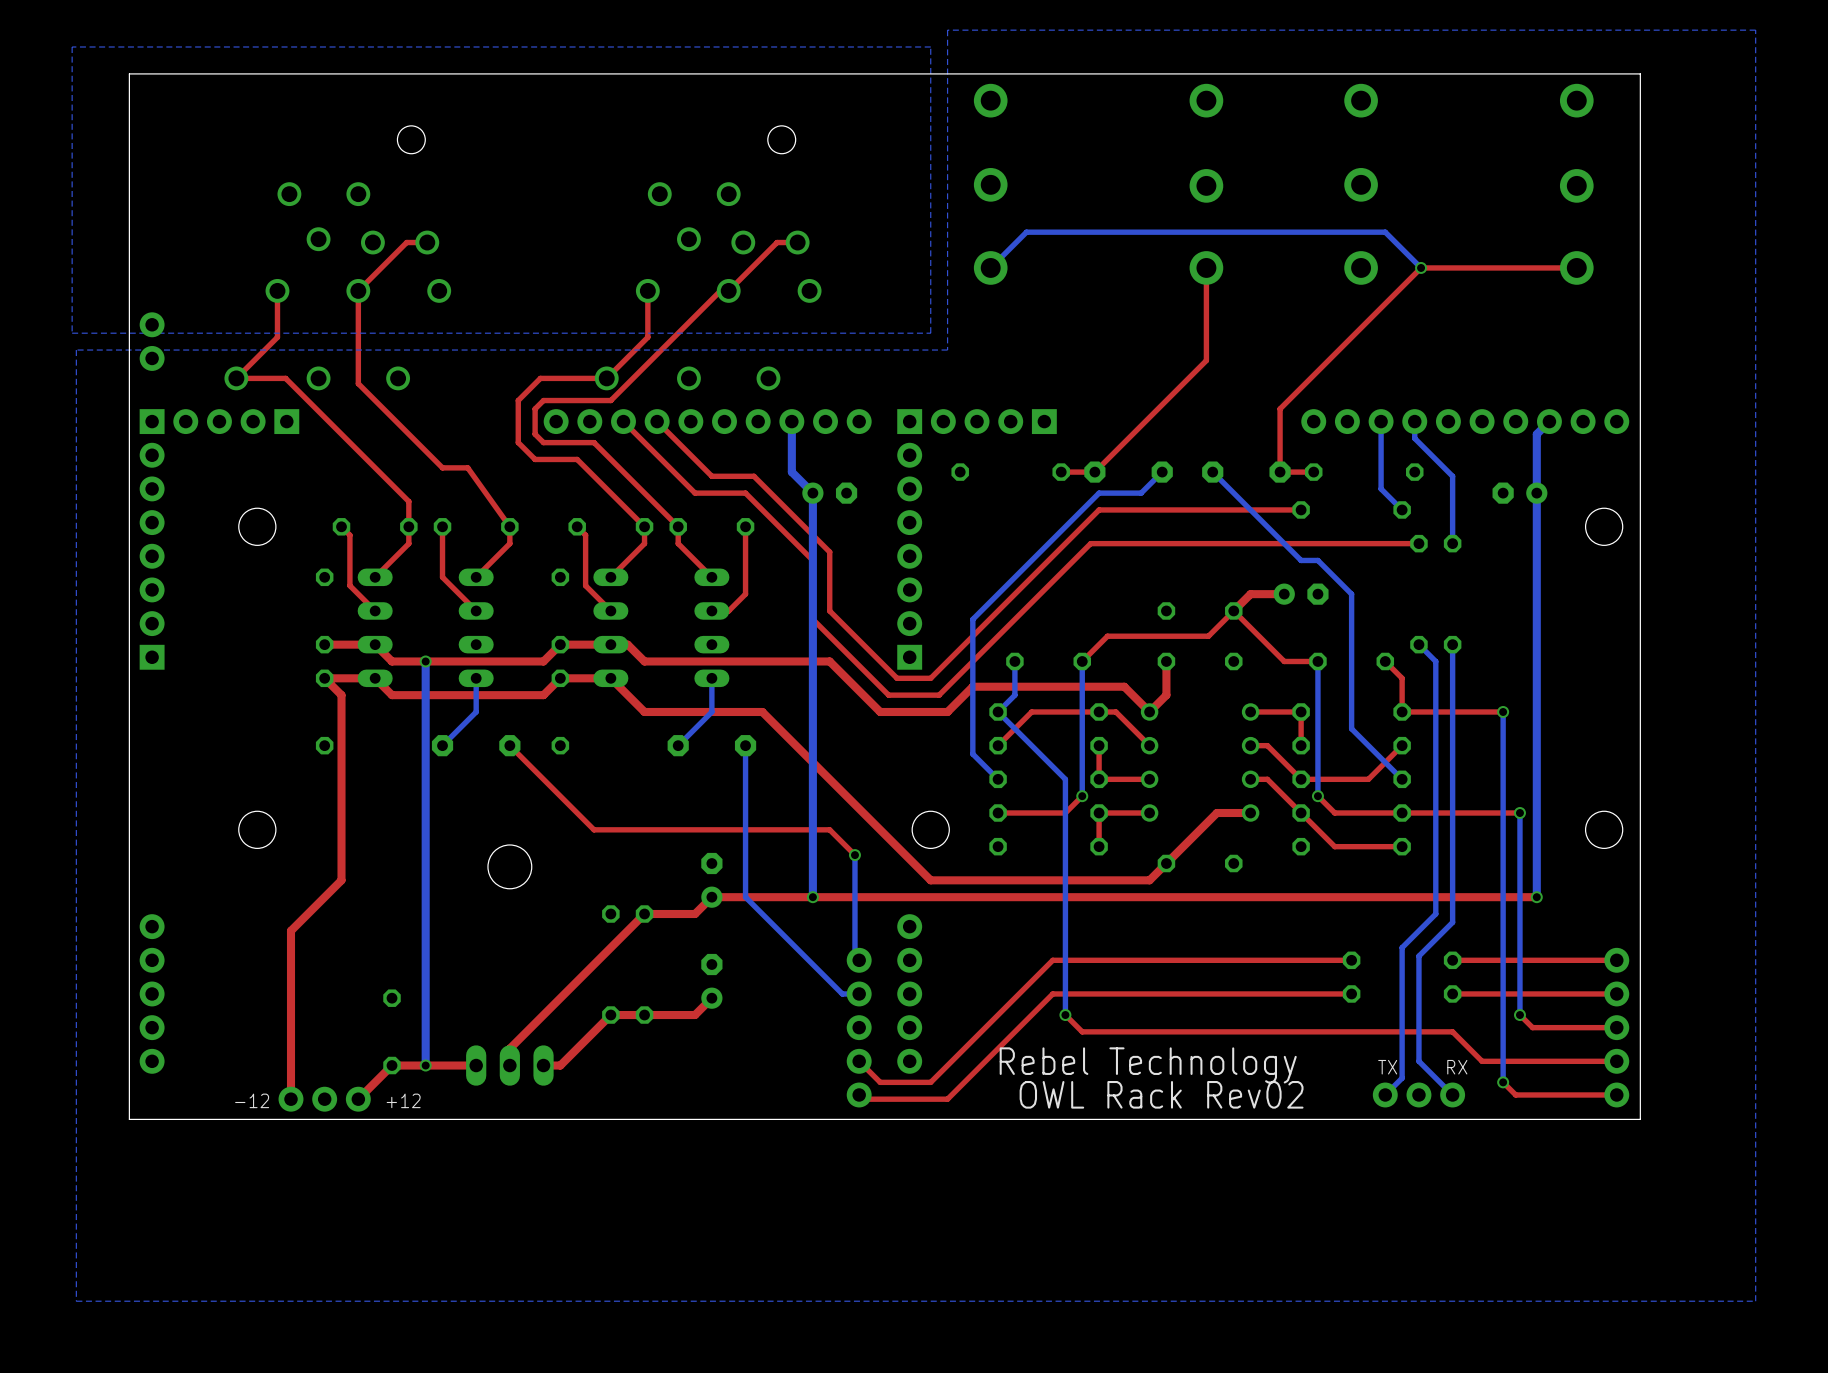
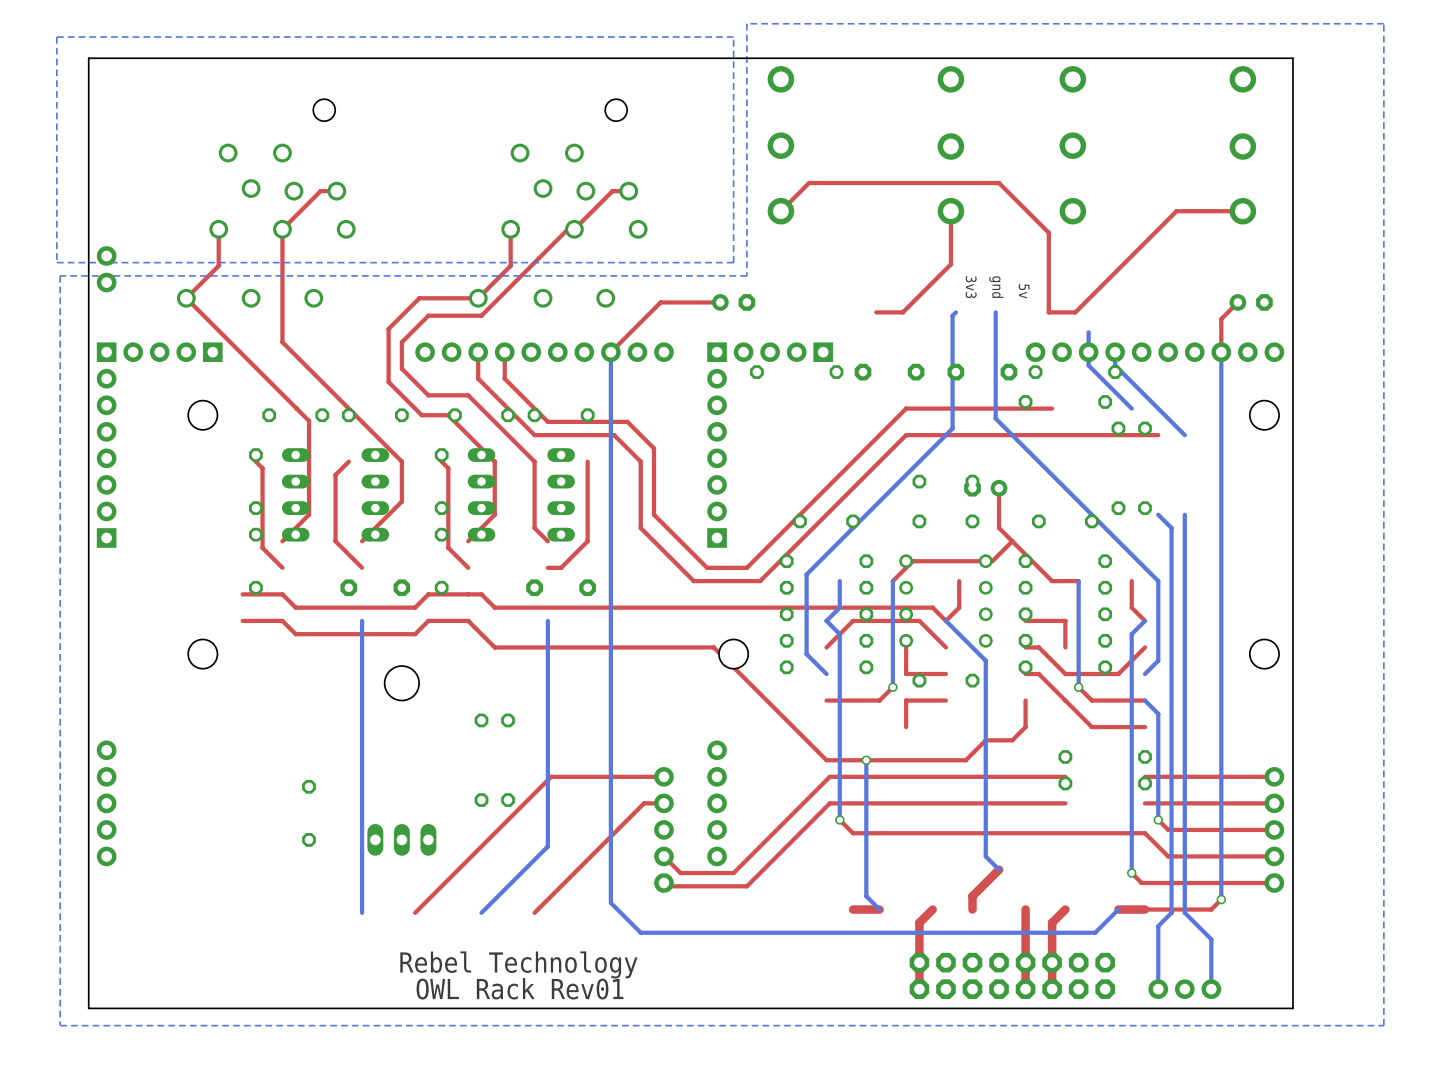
board edge: (129, 73) (129, 1119) (1640, 1119) -> (101, 58) (88, 58) (88, 1008) (1292, 1008) (1292, 882)
bottom track: (1421, 267) (1385, 232) (1026, 232) (990, 267) -> none
via: (1421, 267) -> none
top track: (1492, 267) (1421, 267) (1280, 408) (1280, 472) (1313, 472) -> (1176, 211) (1075, 312) (1048, 312) (1048, 232) (999, 183) (809, 183) (780, 211)
top track: (1206, 335) (1206, 360) (1094, 472) (1061, 472) -> (950, 264) (902, 312) (876, 312)
part position: (152, 341) -> (106, 269)
text: none -> 3v3 (971, 287)
text: none -> gnd (996, 287)
text: none -> 5v (1024, 291)
top track: (236, 378) (285, 378) (408, 501) (408, 543) (375, 577) -> (186, 298) (308, 420) (308, 514) (282, 541)
top track: (540, 378) (518, 400) (518, 442) (535, 459) (577, 459) (644, 526) (644, 543) (610, 577) -> (425, 298) (419, 298) (388, 328) (388, 382) (421, 415) (448, 415) (494, 461) (494, 514) (468, 541)
top track: (358, 383) (442, 467) (467, 467) (509, 526) (509, 543) (476, 577) -> (282, 302) (282, 342) (401, 461) (401, 501) (362, 541)
top track: none -> (720, 302) (660, 302) (610, 352)
top track: none -> (1237, 302) (1221, 319) (1221, 352)
bottom track: none -> (955, 312) (952, 315) (952, 428) (806, 574) (806, 654) (826, 674)
bottom track: none -> (995, 312) (995, 418) (1158, 581) (1158, 660) (1144, 674)
top track: (535, 408) (535, 434) (543, 442) (594, 442) (678, 526) (678, 543) (711, 577) -> (421, 322) (401, 342) (401, 368) (428, 395) (468, 395) (534, 461) (534, 528) (547, 541)
part position: (236, 421) -> (172, 352)
top track: (623, 421) (695, 493) (745, 493) (812, 560) (812, 585) -> (478, 352) (478, 378) (534, 435) (614, 435) (640, 461)
part position: (623, 421) -> (478, 352)
top track: (657, 421) (711, 476) (753, 476) (829, 552) (829, 568) -> (504, 352) (504, 378) (547, 421) (627, 421) (654, 448)
part position: (741, 421) -> (571, 352)
bottom track: (791, 421) (791, 472) (812, 493) (812, 897) -> none
part position: (825, 421) -> (637, 352)
part position: (993, 421) -> (783, 352)
part position: (1381, 421) -> (1088, 352)
bottom track: (1414, 421) (1414, 438) (1452, 476) (1452, 543) -> none
part position: (1498, 421) -> (1181, 352)
bottom track: (1549, 421) (1536, 434) (1536, 897) -> none
part position: (1583, 421) -> (1247, 352)
bottom track: none -> (610, 352) (610, 902) (640, 932) (1095, 932) (1118, 909)
bottom track: none -> (1115, 352) (1115, 365) (1184, 435)
bottom track: none -> (1221, 352) (1221, 899)
bottom track: (1381, 463) (1381, 488) (1402, 509) -> (1088, 365) (1131, 408)
part position: (152, 472) -> (106, 392)
part position: (909, 472) -> (717, 392)
bottom track: (1162, 472) (1141, 493) (1099, 493) (972, 619) (972, 754) (998, 779) -> none
bottom track: (1212, 472) (1301, 560) (1317, 560) (1351, 594) (1351, 728) (1402, 779) -> none
part position: (829, 493) -> (733, 302)
part rotation: 0° (1519, 493) -> 180° (1251, 302)
part position: (1519, 493) -> (1251, 302)
top track: (1301, 509) (1099, 509) (930, 678) (897, 678) (829, 610) -> (1052, 408) (906, 408) (746, 567) (707, 567) (654, 514) (654, 481)
top track: (341, 526) (349, 535) (349, 585) (375, 610) -> none
top track: (442, 526) (442, 577) (476, 610) -> none
top track: (577, 526) (585, 535) (585, 585) (610, 610) -> none
top track: (745, 526) (745, 585) -> none
top track: (1418, 543) (1090, 543) (939, 695) (888, 695) (812, 619) -> (1158, 435) (906, 435) (760, 581) (693, 581) (640, 528) (640, 488)
top track: none -> (255, 461) (262, 468) (262, 547) (282, 567)
top track: none -> (348, 461) (335, 474) (335, 541) (362, 567)
top track: none -> (441, 461) (448, 468) (448, 547) (468, 567)
top track: (745, 594) (728, 610) (711, 610) -> (587, 468) (587, 541) (561, 567) (547, 567)
top track: (1284, 594) (1250, 594) (1233, 610) -> none
part rotation: 0° (1301, 594) -> 180° (985, 488)
part position: (1301, 594) -> (985, 488)
part position: (152, 606) -> (106, 498)
part position: (909, 606) -> (717, 498)
top track: (1233, 610) (1284, 661) (1317, 661) -> none
top track: (1233, 610) (1208, 636) (1107, 636) (1082, 661) -> none
top track: none -> (999, 488) (999, 528) (1052, 581) (1078, 581)
top track: (324, 644) (375, 644) (392, 661) (543, 661) (560, 644) (627, 644) (644, 661) (829, 661) (880, 711) (947, 711) (972, 686) (1124, 686) (1149, 711) (1166, 695) (1166, 661) -> none
bottom track: (1418, 644) (1435, 661) (1435, 804) -> (1144, 620) (1131, 634)
bottom track: (1452, 644) (1452, 922) (1418, 956) (1418, 1061) (1452, 1094) -> none
bottom track: none -> (1158, 514) (1171, 528) (1171, 912) (1158, 926) (1158, 989)
bottom track: none -> (1184, 514) (1184, 561)
bottom track: (425, 661) (425, 1065) -> none
via: (425, 661) -> none
bottom track: (1014, 661) (1014, 695) (998, 711) (1065, 779) (1065, 804) -> (839, 581) (839, 607) (826, 620) (839, 634)
bottom track: (1082, 661) (1082, 796) -> (892, 581) (892, 687)
bottom track: (1317, 661) (1317, 796) -> (1078, 581) (1078, 687)
top track: (1385, 661) (1402, 678) (1402, 711) (1503, 711) -> none
bottom track: (476, 678) (476, 711) (442, 745) -> none
bottom track: (711, 678) (711, 711) (678, 745) -> none
top track: none -> (985, 561) (912, 561) (892, 581)
top track: (1259, 711) (1301, 711) (1301, 745) -> (992, 561) (1012, 541)
via: (1503, 711) -> none
top track: none -> (959, 581) (959, 607) (945, 620) (932, 607) (494, 607) (481, 594) (428, 594) (415, 607) (295, 607) (282, 594) (242, 594)
top track: none -> (1131, 581) (1131, 607) (1144, 620)
top track: (509, 745) (594, 829) (829, 829) (854, 855) -> none
bottom track: (745, 745) (745, 897) (842, 993) (859, 993) -> none
top track: (1099, 745) (1099, 779) (1149, 779) -> (906, 647) (906, 674) (945, 674)
top track: (1149, 745) (1115, 711) (1031, 711) (998, 745) -> (945, 647) (919, 620) (853, 620) (826, 647)
top track: (1402, 745) (1368, 779) (1301, 779) (1267, 745) (1250, 745) -> (1144, 647) (1118, 674) (1065, 674) (1038, 647) (1025, 647)
top track: (1250, 779) (1267, 779) (1334, 846) (1402, 846) -> (1025, 674) (1038, 674) (1091, 727) (1144, 727)
top track: none -> (242, 620) (282, 620) (295, 634) (415, 634) (428, 620) (468, 620) (494, 647) (713, 647) (826, 760) (965, 760) (985, 740) (1012, 740) (1025, 727) (1025, 700)
bottom track: none -> (362, 620) (362, 912)
bottom track: none -> (547, 620) (547, 846) (481, 912)
bottom track: none -> (945, 620) (985, 660) (985, 856) (999, 869)
top track: none -> (1025, 620) (1065, 620) (1065, 647)
top track: (1082, 796) (1065, 813) (998, 813) -> (892, 687) (879, 700) (826, 700)
via: (1082, 796) -> none
top track: (1317, 796) (1334, 813) (1519, 813) -> none
via: (1317, 796) -> none
top track: (1149, 813) (1099, 813) (1099, 846) -> (945, 700) (906, 700) (906, 727)
top track: (1250, 813) (1216, 813) (1149, 880) (930, 880) (762, 711) (644, 711) (610, 678) (560, 678) (543, 695) (392, 695) (375, 678) (324, 678) (341, 695) (341, 880) (291, 930) (291, 1099) -> none
bottom track: (1519, 813) (1519, 1015) -> none
via: (1519, 813) -> none
bottom track: (854, 855) (854, 956) (859, 960) -> none
via: (854, 855) -> none
via: none -> (892, 687)
top track: none -> (1078, 687) (1091, 700) (1144, 700)
via: none -> (1078, 687)
part: (711, 880) -> none
bottom track: none -> (1144, 700) (1158, 713) (1158, 819)
via: (812, 897) -> none
top track: (1536, 897) (711, 897) (695, 914) (644, 914) (509, 1048) (509, 1065) -> none
via: (1536, 897) -> none
bottom track: (1435, 914) (1402, 947) (1402, 1078) (1385, 1094) -> (1131, 720) (1131, 873)
top track: (1351, 960) (1052, 960) (930, 1082) (880, 1082) (859, 1061) -> none
top track: (1616, 960) (1452, 960) -> (1274, 776) (1144, 776)
bottom track: none -> (866, 760) (866, 896) (879, 909)
via: none -> (866, 760)
part position: (859, 977) -> (663, 790)
part position: (1616, 977) -> (1274, 790)
part: (711, 981) -> none
top track: none -> (663, 776) (551, 776) (415, 912)
top track: none -> (1065, 776) (829, 776) (733, 873) (680, 873) (663, 856)
part position: (152, 993) -> (106, 803)
part position: (909, 993) -> (717, 803)
top track: (1351, 993) (1052, 993) (947, 1099) (863, 1099) (859, 1094) -> none
top track: (1616, 993) (1452, 993) -> (1274, 803) (1144, 803)
top track: (711, 998) (695, 1015) (610, 1015) (560, 1065) (543, 1065) -> none
top track: (1065, 1015) (1082, 1031) (1452, 1031) (1482, 1061) (1616, 1061) -> (839, 819) (853, 833) (1144, 833) (1168, 856) (1274, 856)
bottom track: none -> (839, 800) (839, 819)
via position: (1065, 1015) -> (839, 819)
top track: (1519, 1015) (1532, 1027) (1616, 1027) -> none
via: (1519, 1015) -> none
top track: none -> (663, 803) (644, 803) (534, 912)
top track: none -> (1065, 803) (829, 803) (746, 886) (667, 886) (663, 883)
part position: (859, 1027) -> (663, 829)
part position: (1616, 1027) -> (1274, 829)
top track: none -> (1158, 819) (1168, 829) (1274, 829)
via: none -> (1158, 819)
via: (425, 1065) -> none
top track: (476, 1065) (392, 1065) (358, 1099) -> none
text: Rebel Technology (1148, 1065) -> none
text: TX (1387, 1067) -> none
text: RX (1457, 1067) -> none
part position: (859, 1078) -> (663, 869)
part position: (1616, 1078) -> (1274, 869)
top track: (1503, 1082) (1515, 1094) (1616, 1094) -> none
bottom track: none -> (1184, 853) (1184, 912) (1211, 939) (1211, 989)
via: (1503, 1082) -> none
text: OWL Rack Rev02 (1161, 1094) -> none
part position: (1418, 1094) -> (1184, 989)
part: (324, 1099) -> none
text: -12 (252, 1100) -> none
text: +12 (403, 1100) -> none
top track: none -> (999, 869) (972, 896) (972, 909)
top track: none -> (1131, 873) (1141, 883) (1274, 883)
via: none -> (1131, 873)
top track: none -> (1221, 899) (1211, 909) (1118, 909)
via: none -> (1221, 899)
top track: none -> (879, 909) (853, 909)
top track: none -> (932, 909) (919, 922) (919, 989)
top track: none -> (1025, 909) (1025, 989)
top track: none -> (1065, 909) (1052, 922) (1052, 989)
text: none -> Rebel Technology (518, 964)
part: none -> (1012, 975)
text: none -> OWL Rack Rev01 (519, 988)

